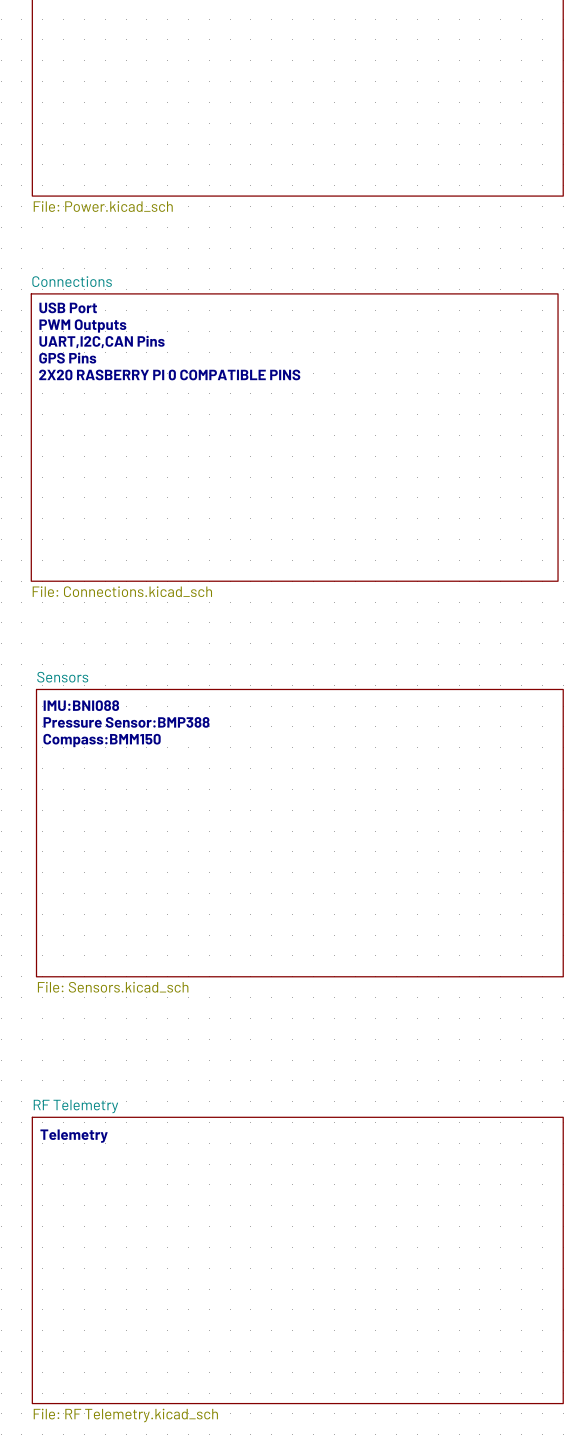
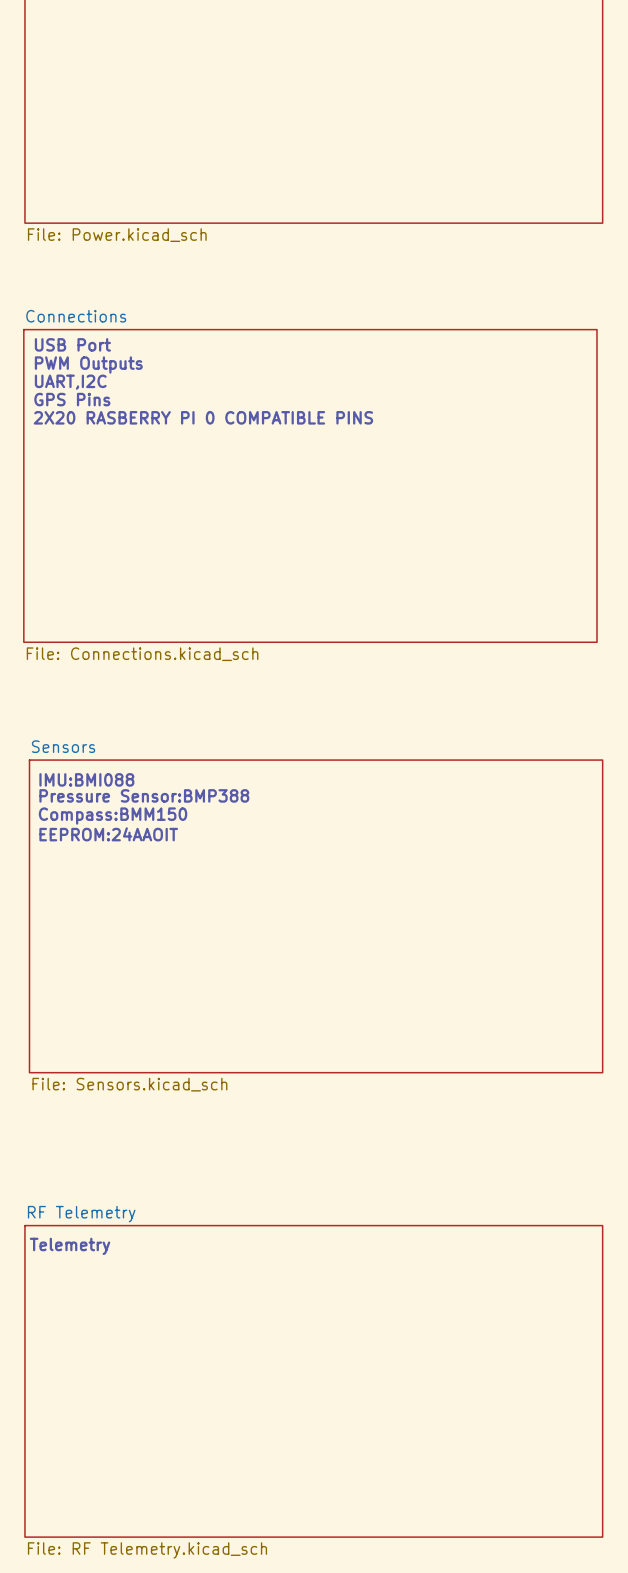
text: UART,I2C,CAN Pins (102, 341) -> UART,I2C (70, 382)
text: IMU:BNI088 (81, 705) -> IMU:BMI088 (86, 779)
text: none -> EEPROM:24AAOIT (108, 834)

